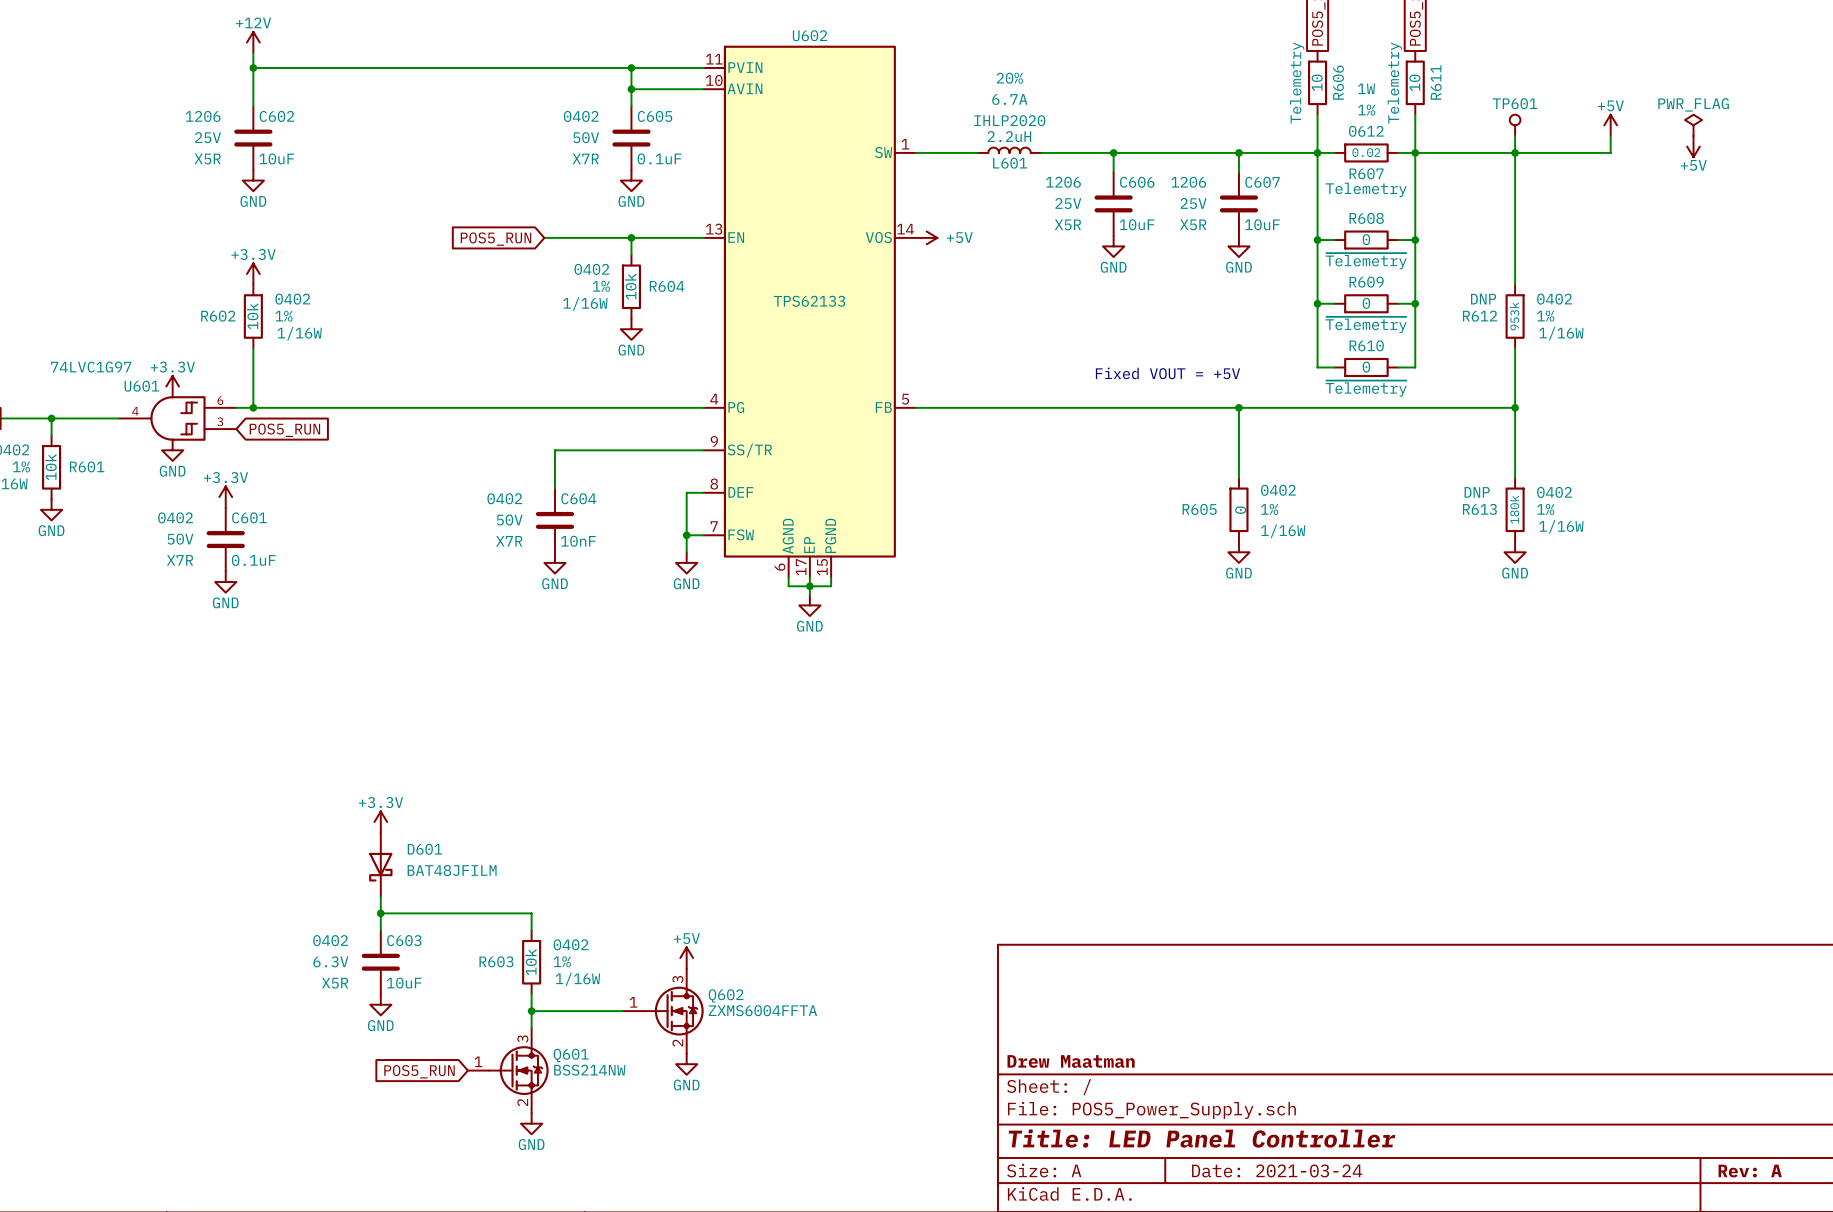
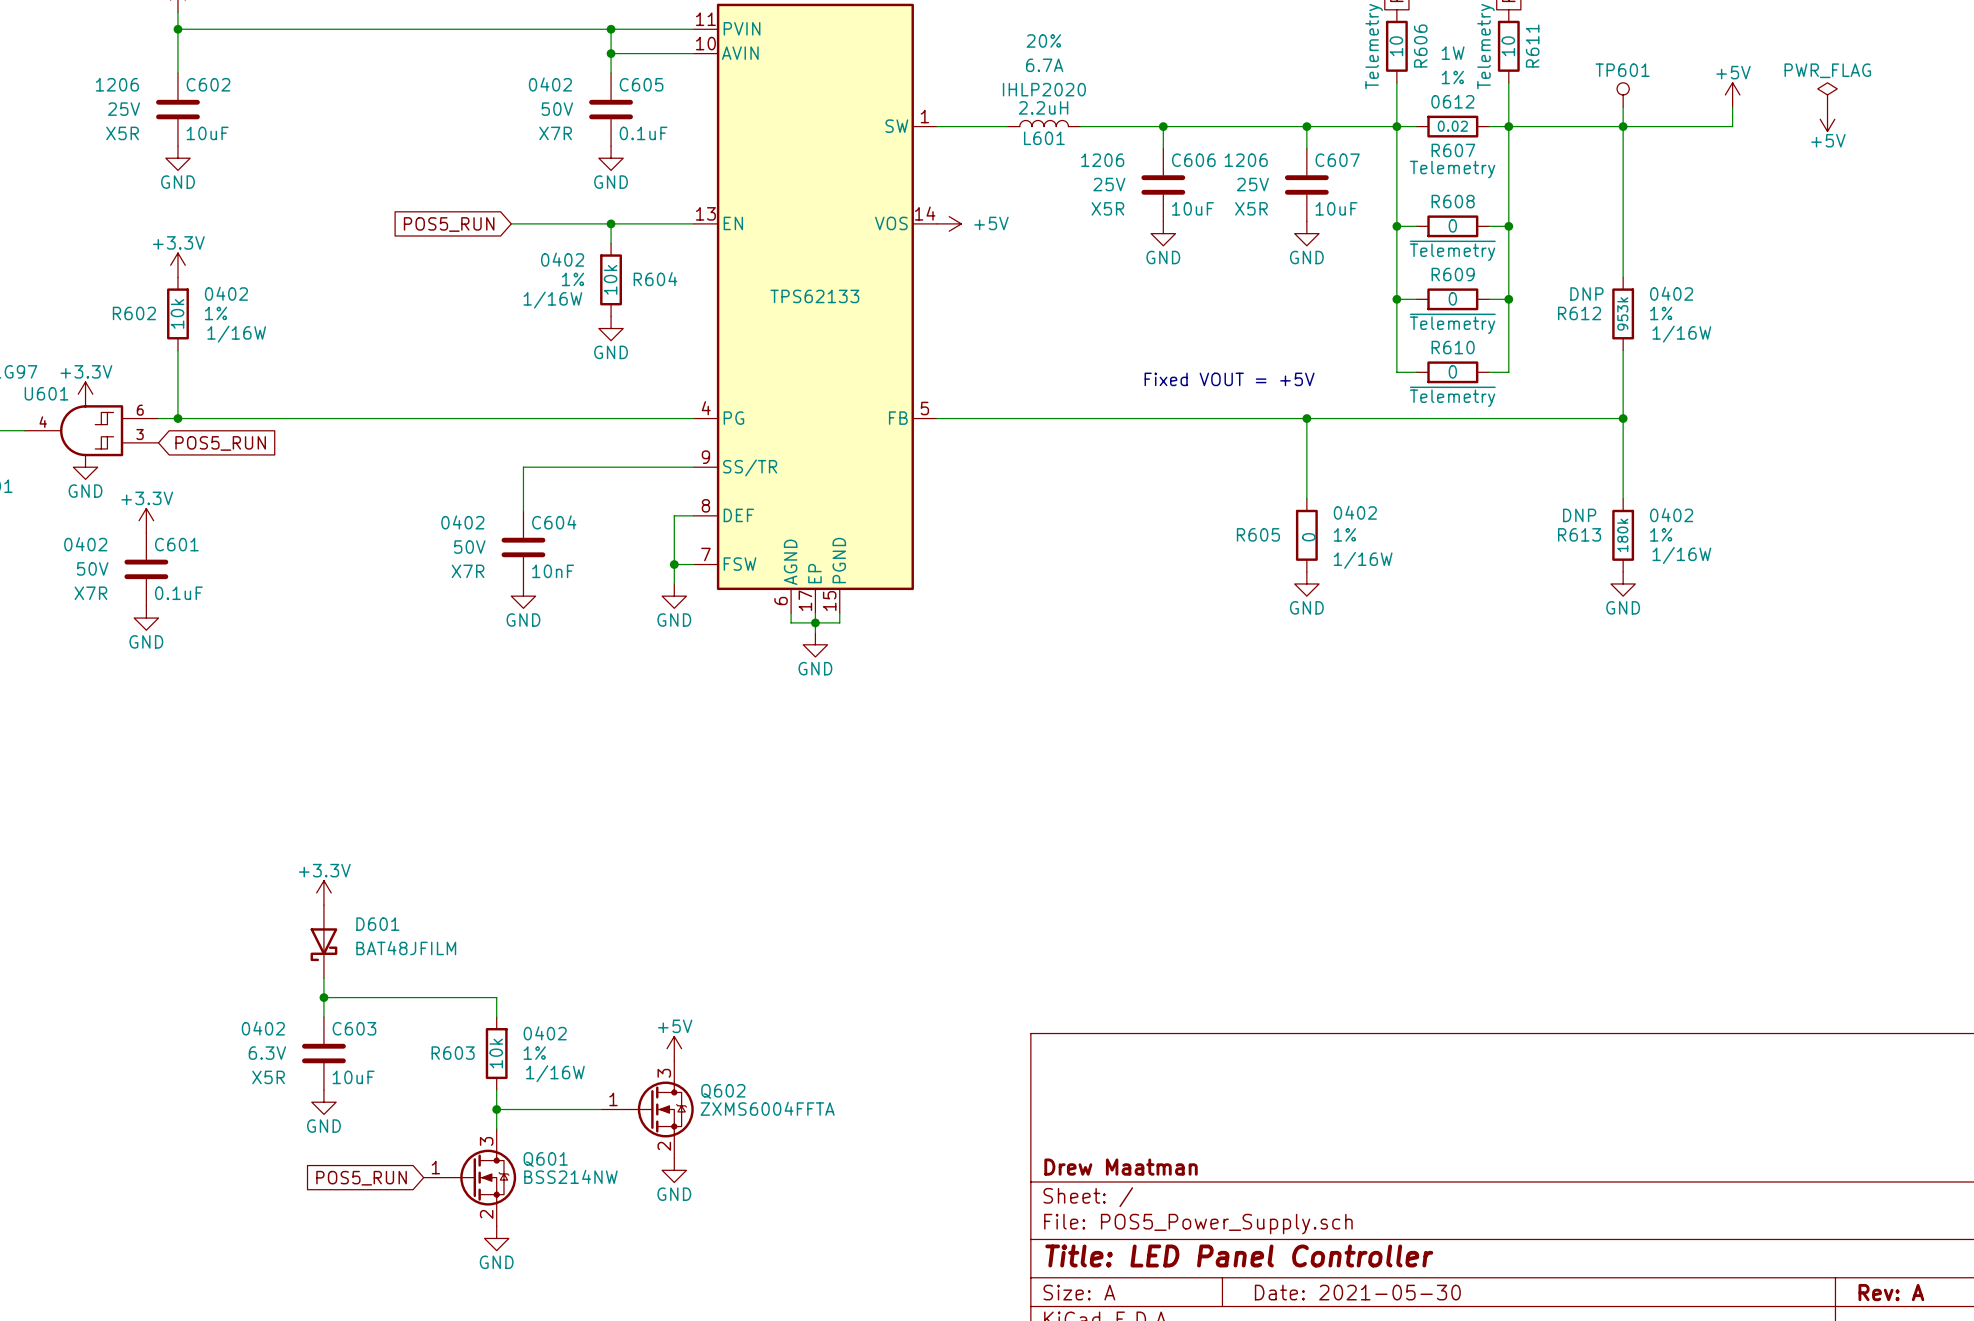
title block: Date: 2021-03-24 (1277, 1170) -> Date: 2021-05-30 (1357, 1292)

